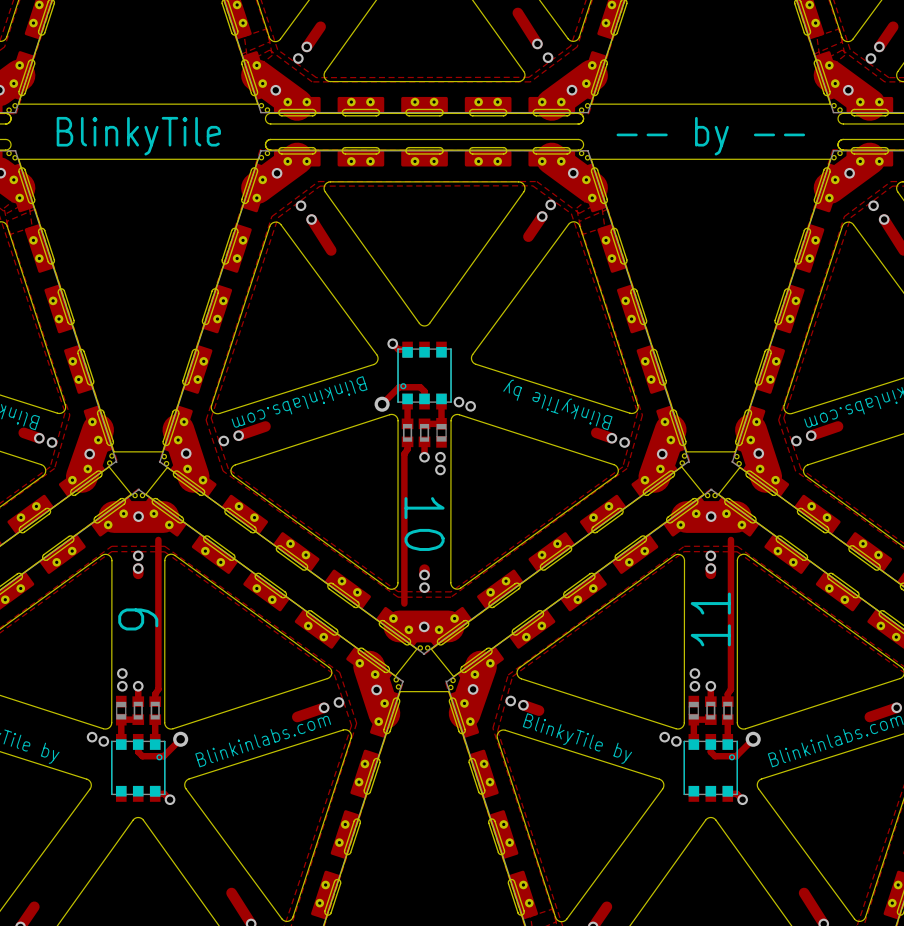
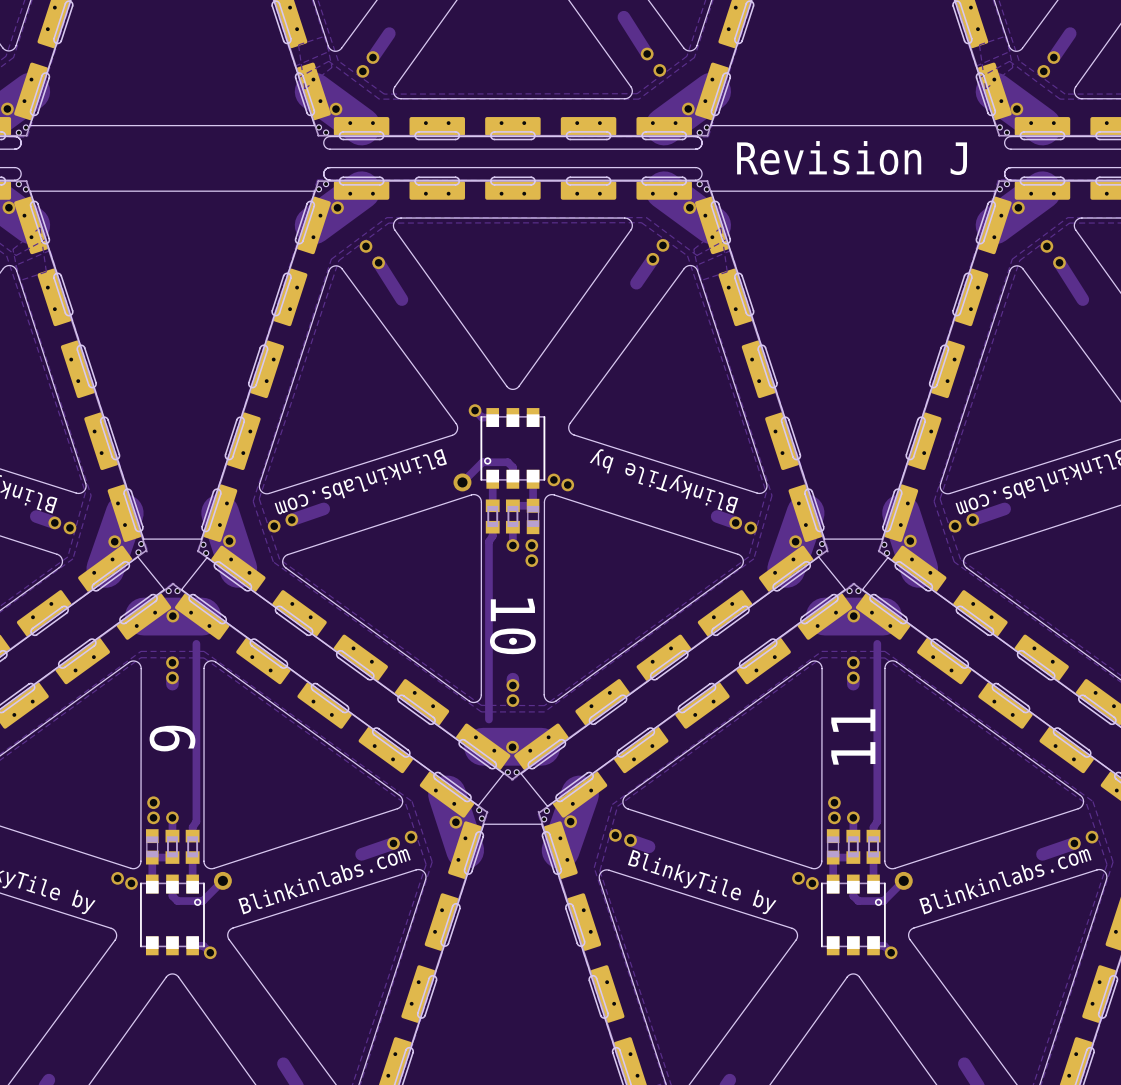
text: BlinkyTile (138, 136) -> none
text: -- by -- (710, 136) -> Revision J (852, 158)

